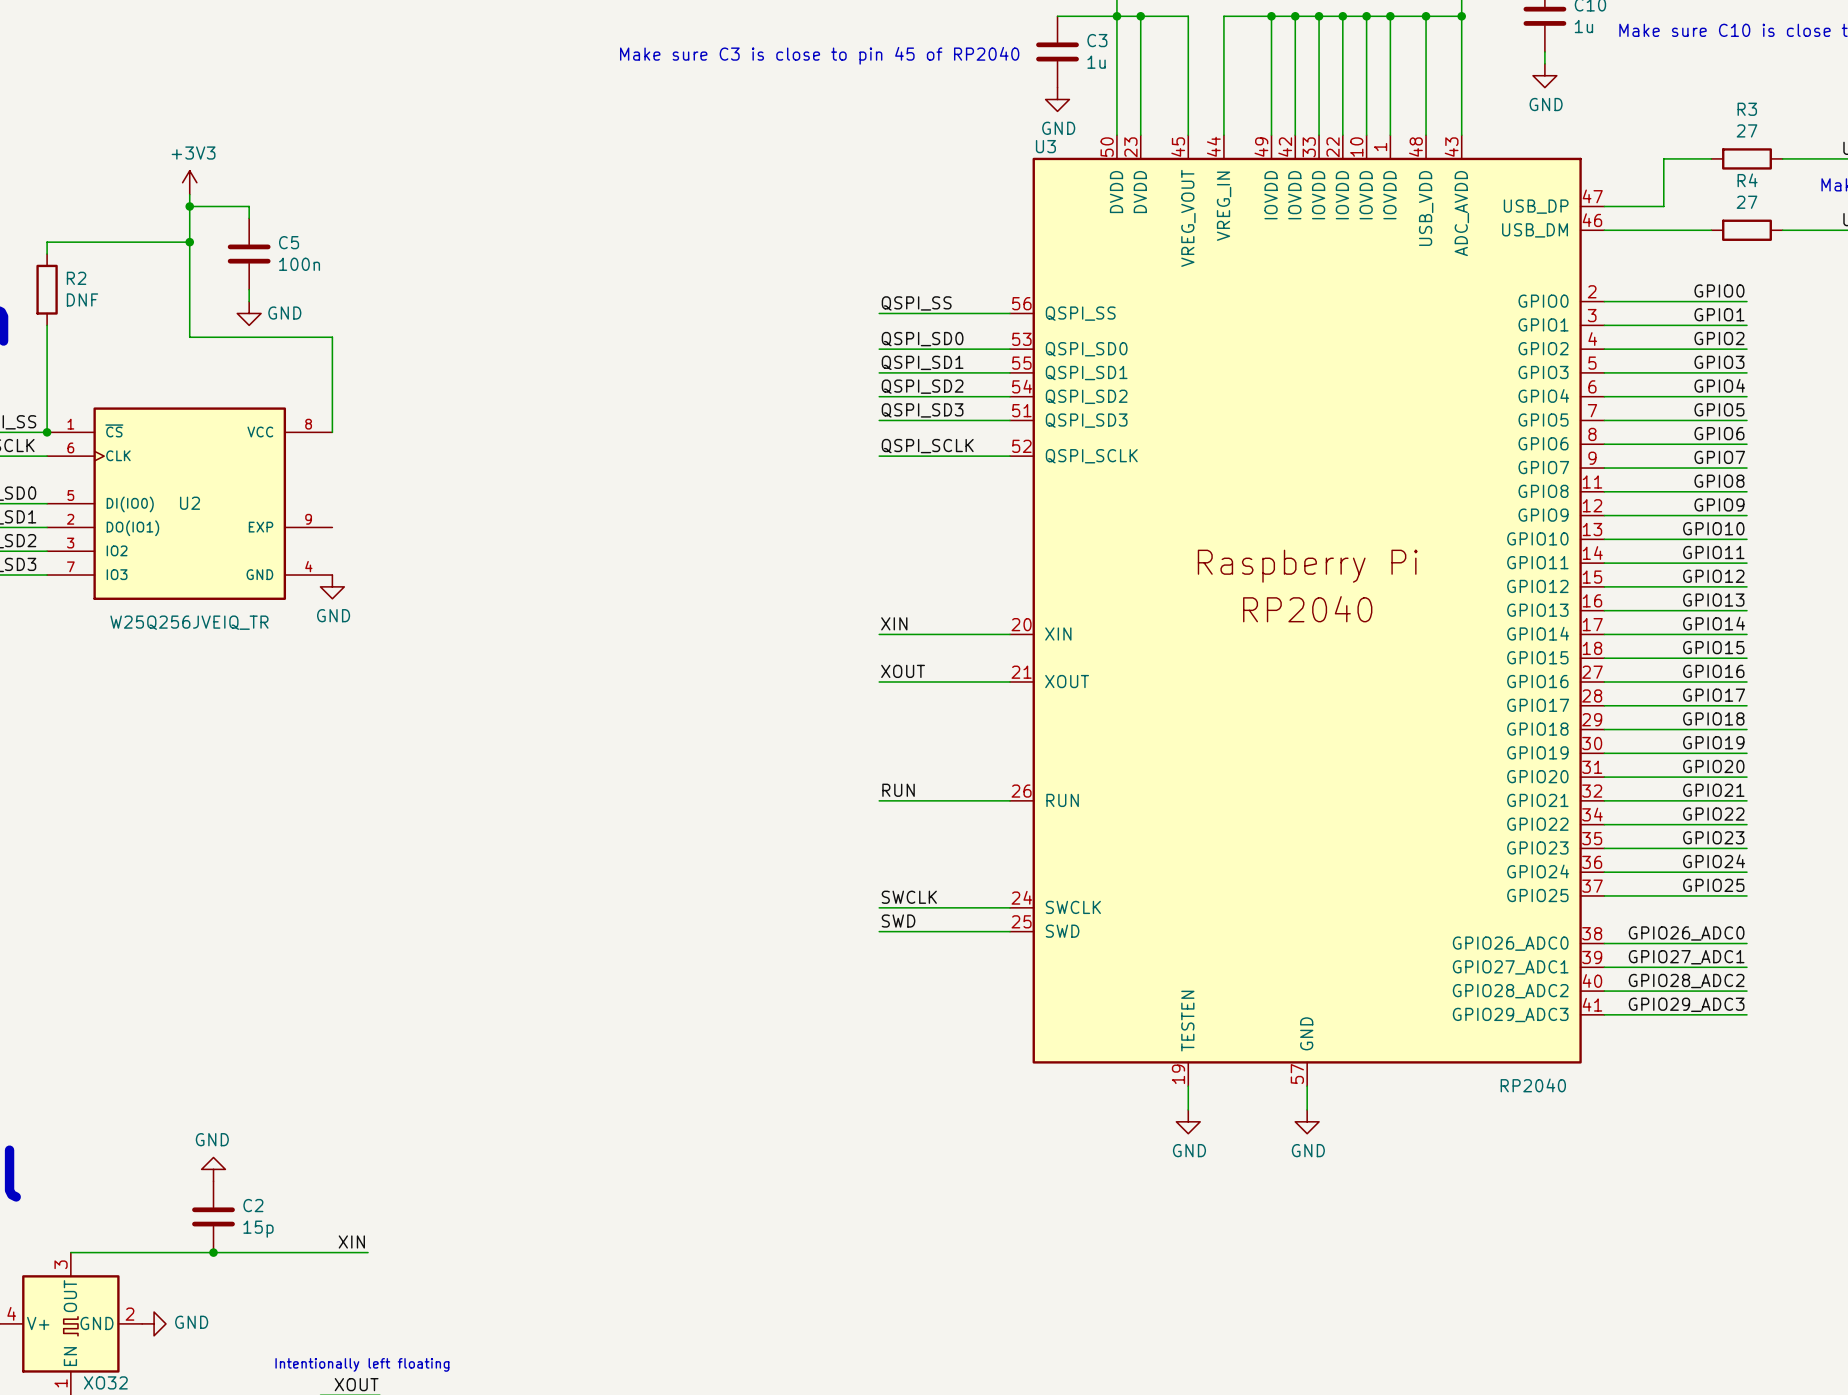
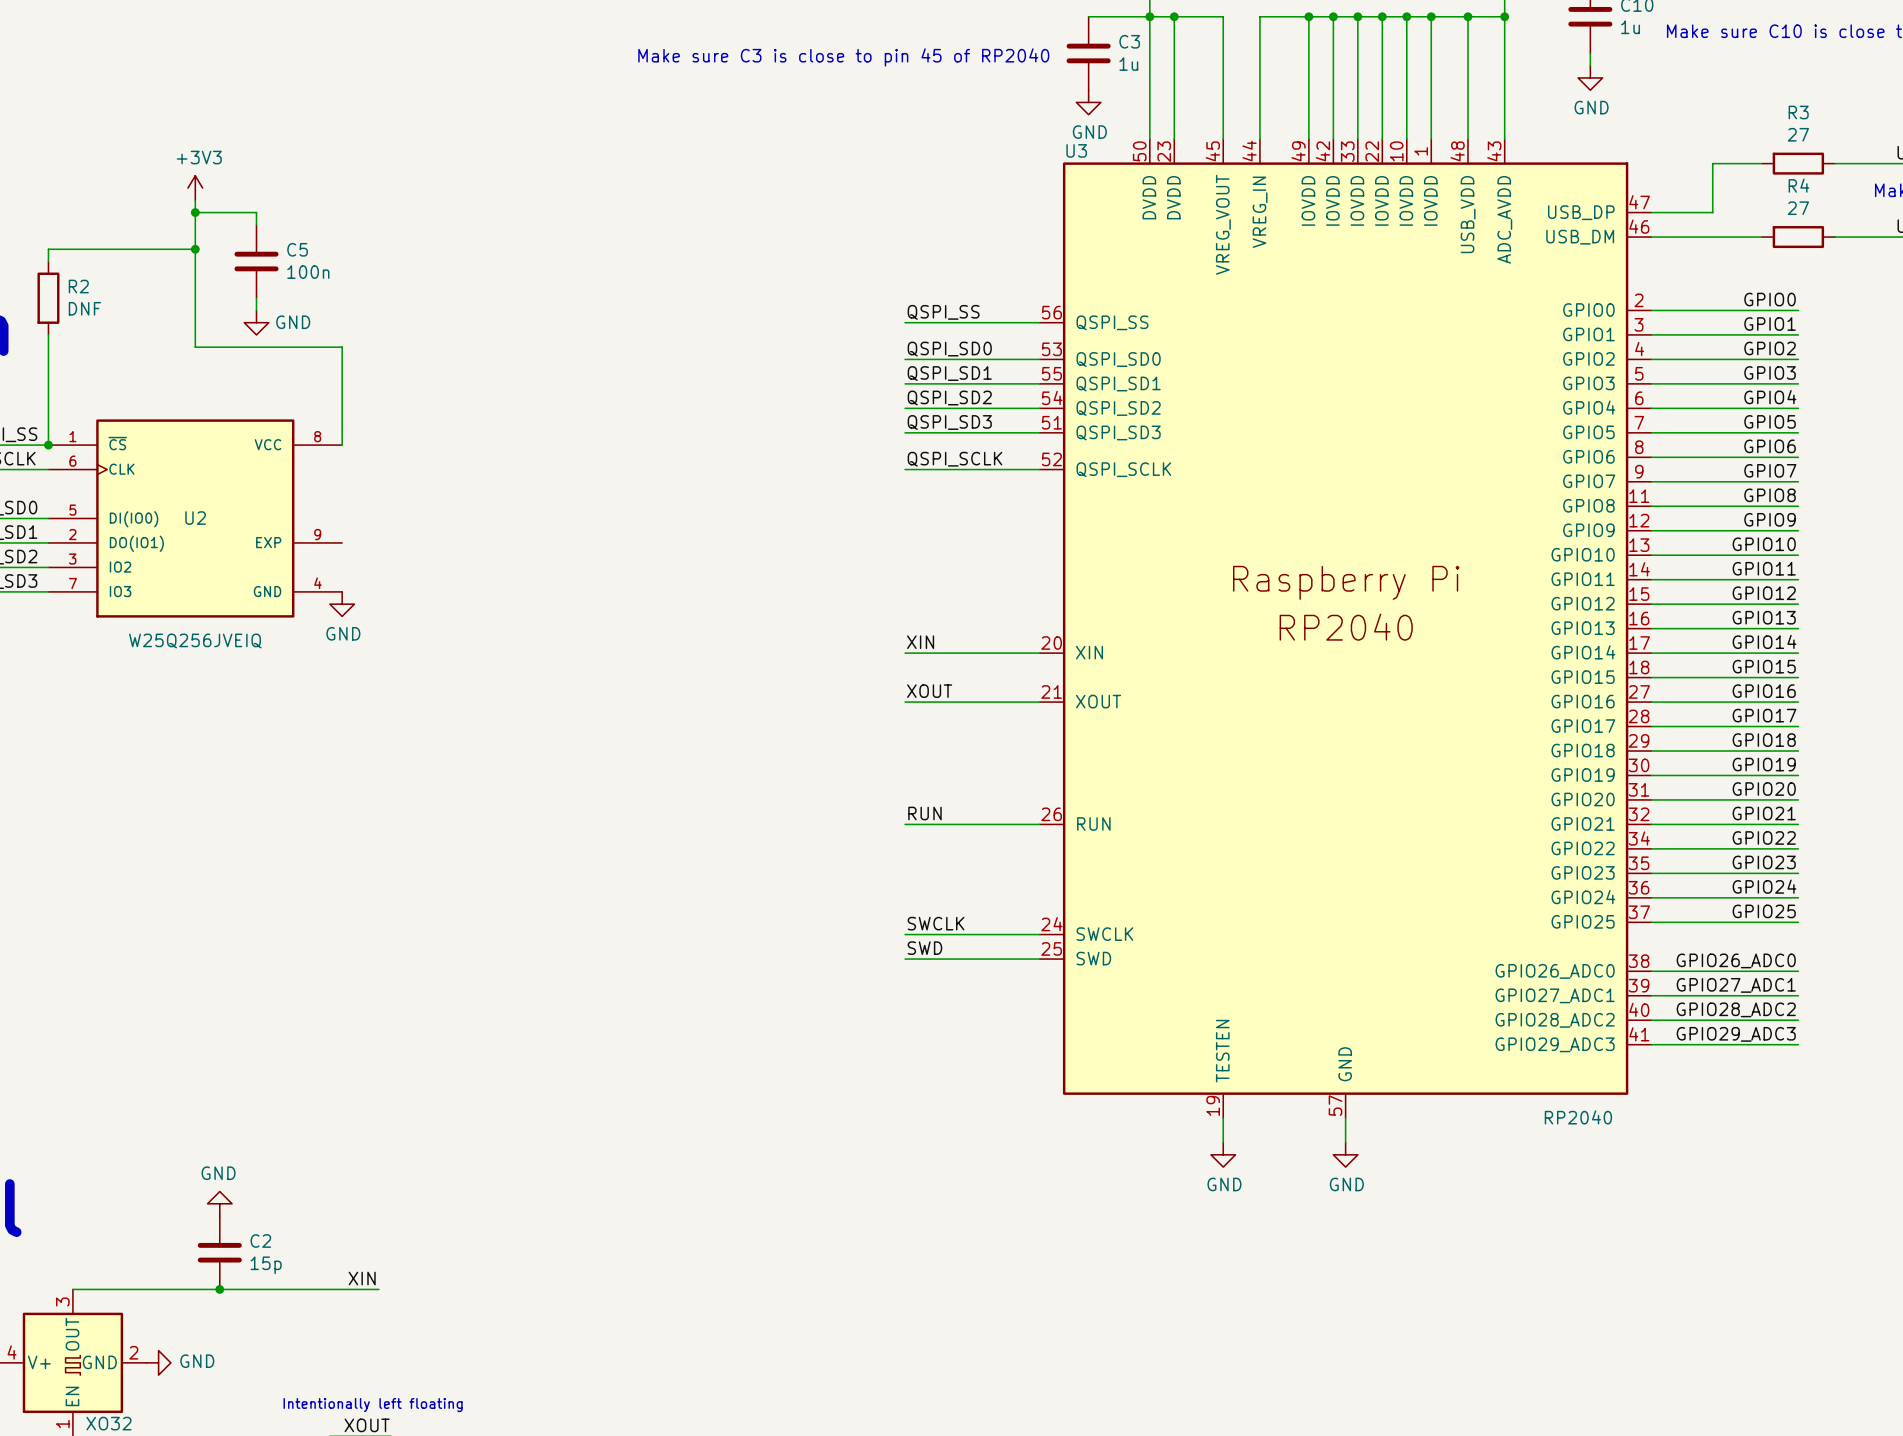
U2 value: W25Q256JVEIQ_TR (189, 622) -> W25Q256JVEIQ (195, 640)

